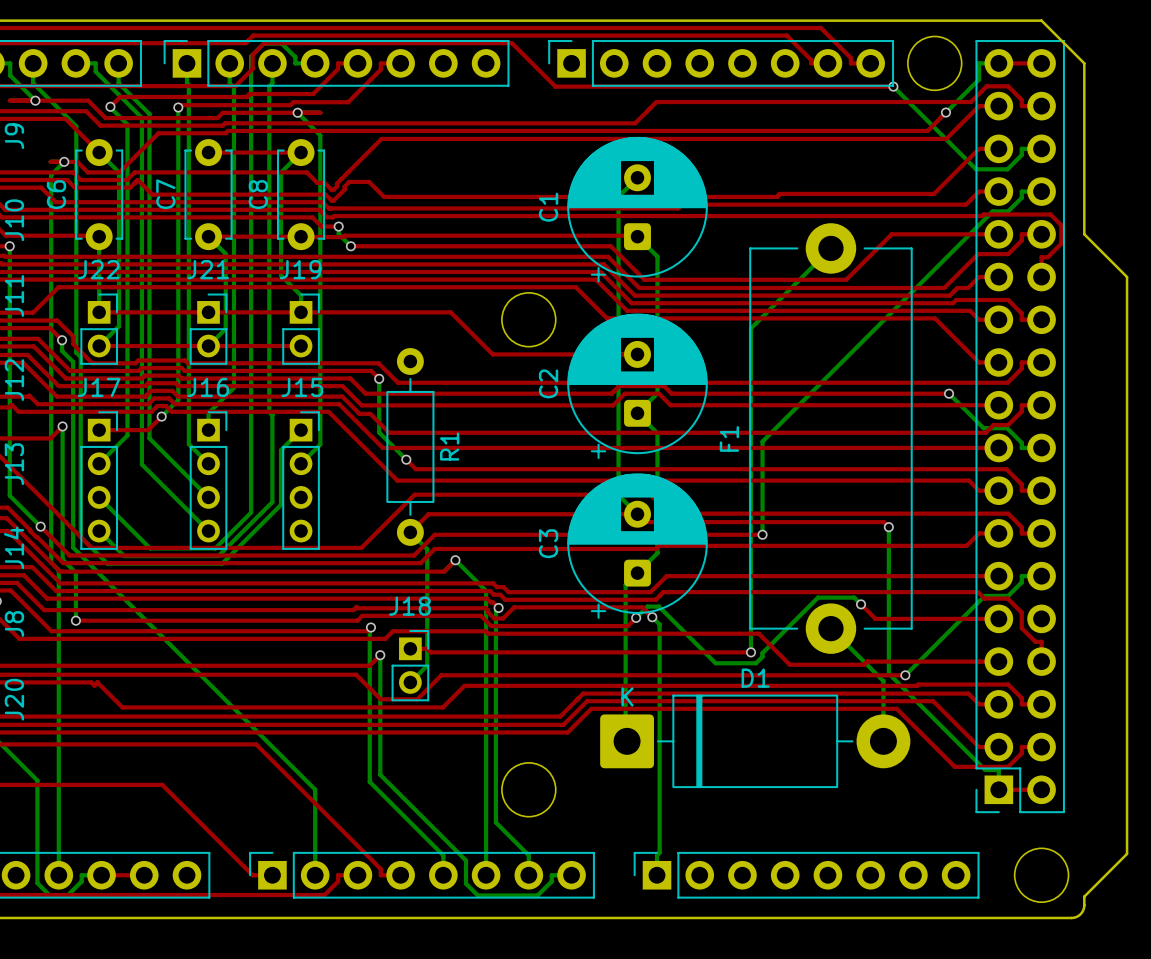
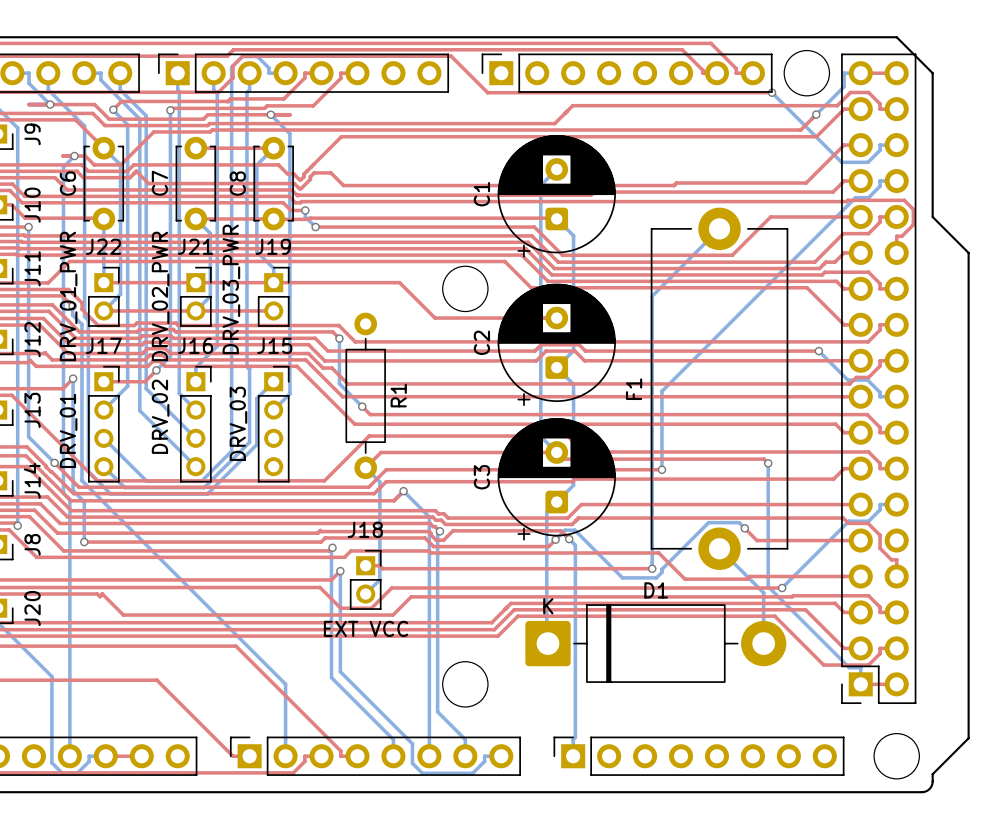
J19 value: none -> DRV_03_PWR (231, 289)
J22 value: none -> DRV_01_PWR (68, 296)
J21 value: none -> DRV_02_PWR (160, 296)
J16 value: none -> DRV_02 (160, 416)
J15 value: none -> DRV_03 (238, 423)
J17 value: none -> DRV_01 (68, 430)
J18 value: none -> EXT VCC (366, 628)

